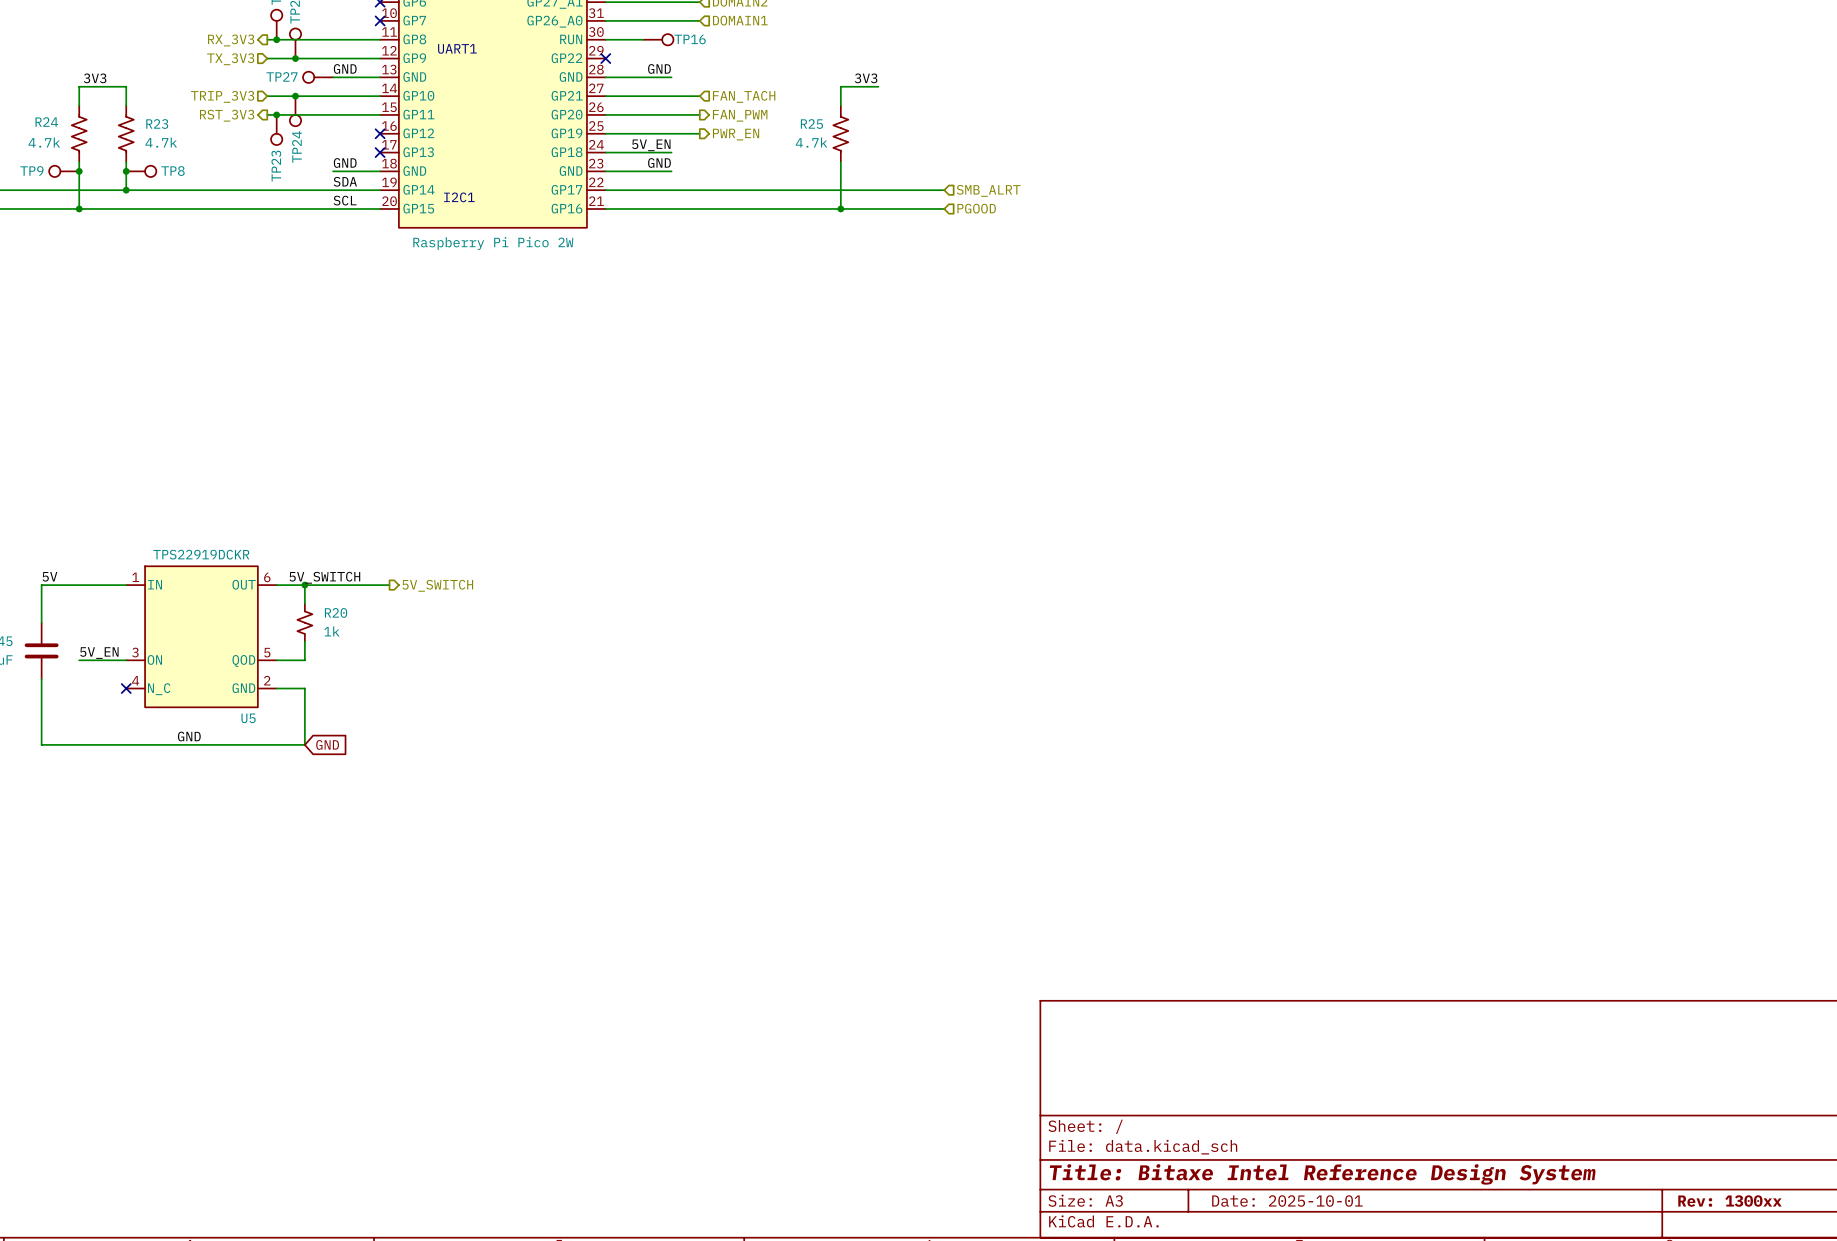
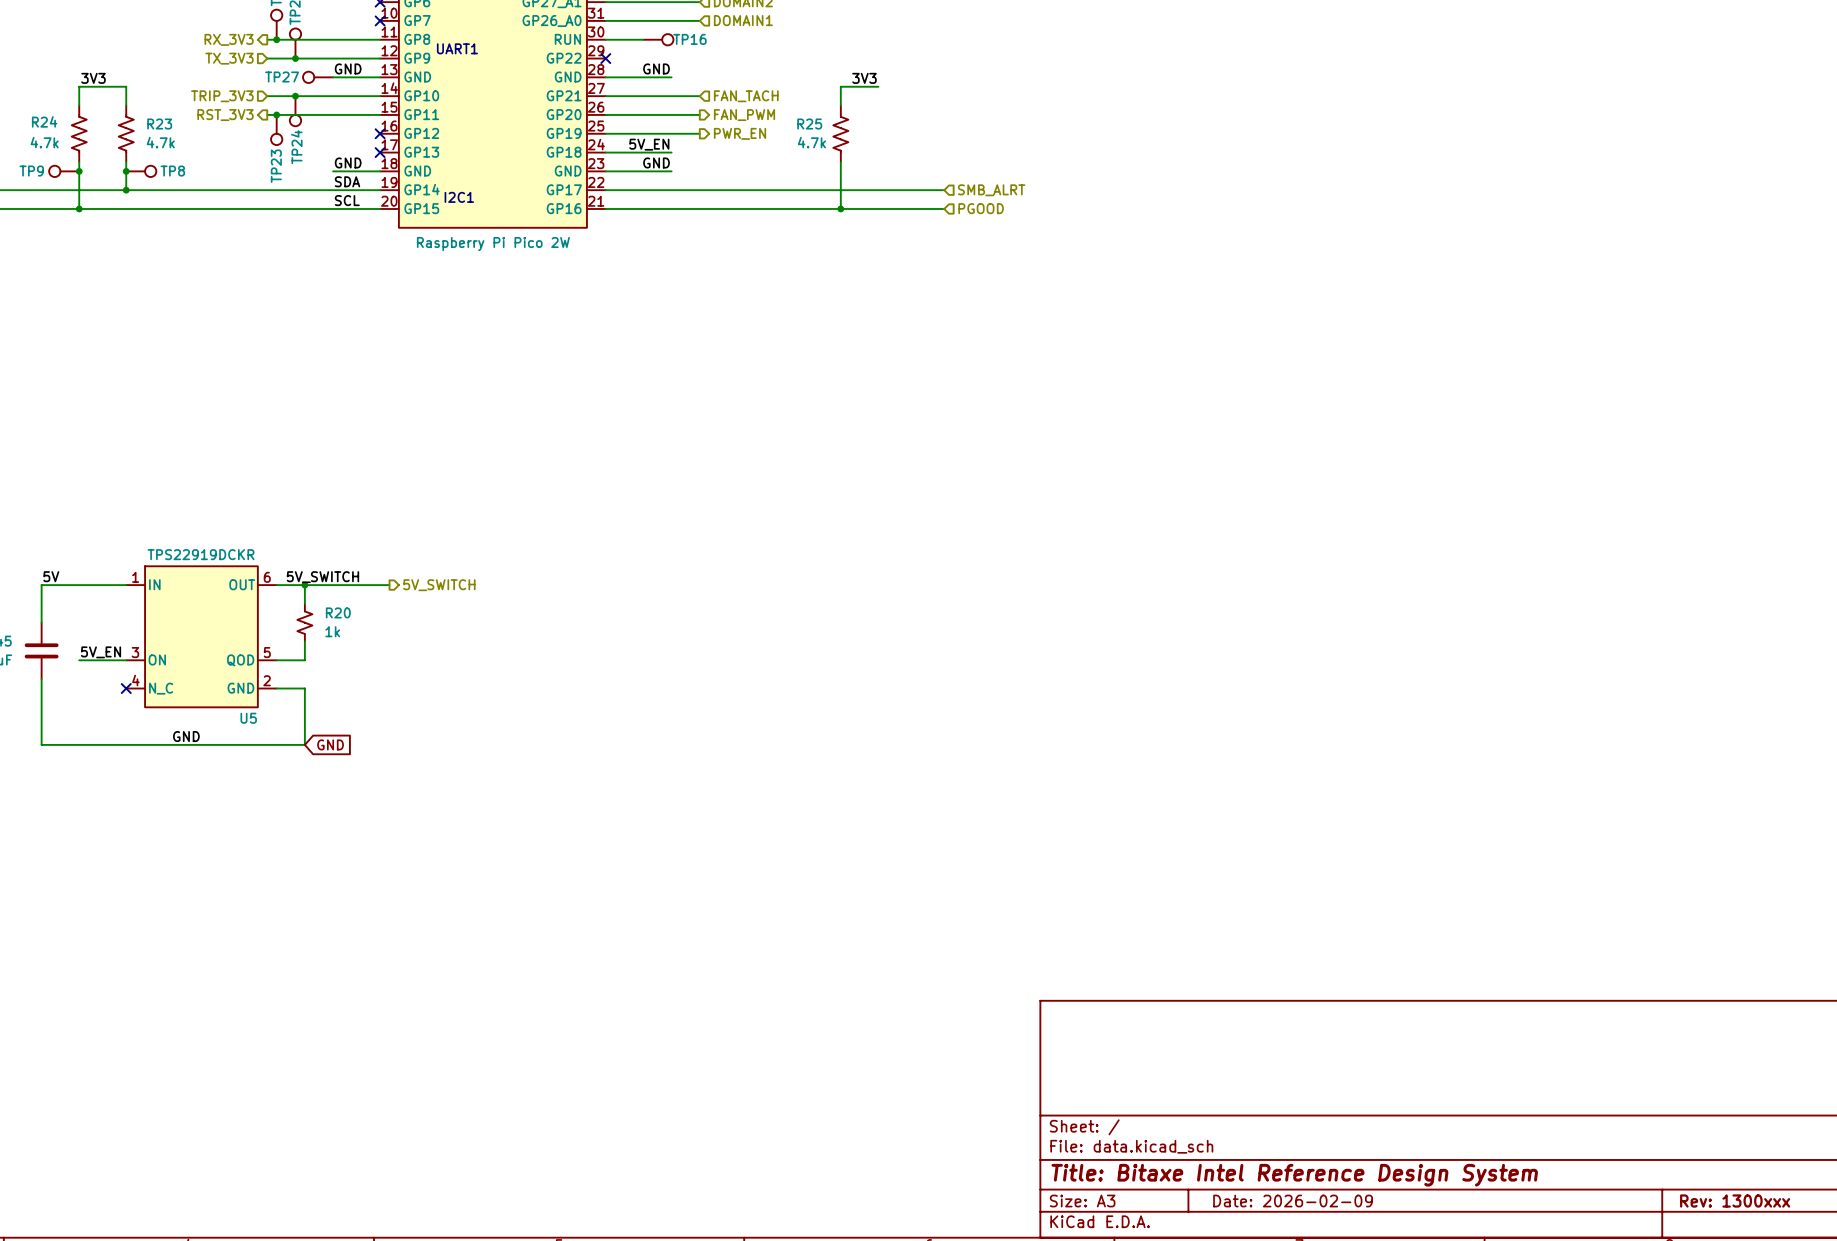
title block: Date: 2025-10-01 (1287, 1201) -> Date: 2026-02-09 (1293, 1201)
title block: Rev: 1300xx (1729, 1201) -> Rev: 1300xxx (1735, 1201)

